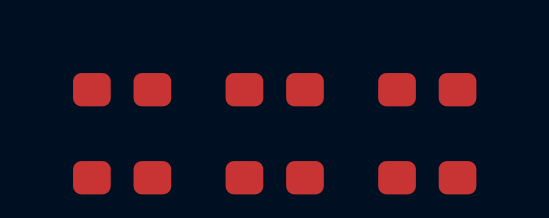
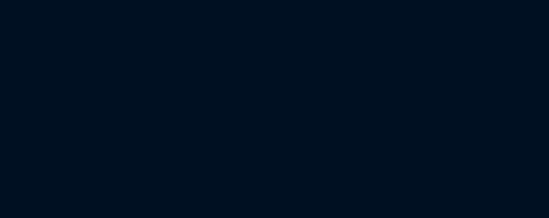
part: (122, 89) -> none
part: (274, 89) -> none
part: (427, 89) -> none
part: (122, 177) -> none
part: (274, 177) -> none
part: (427, 177) -> none

